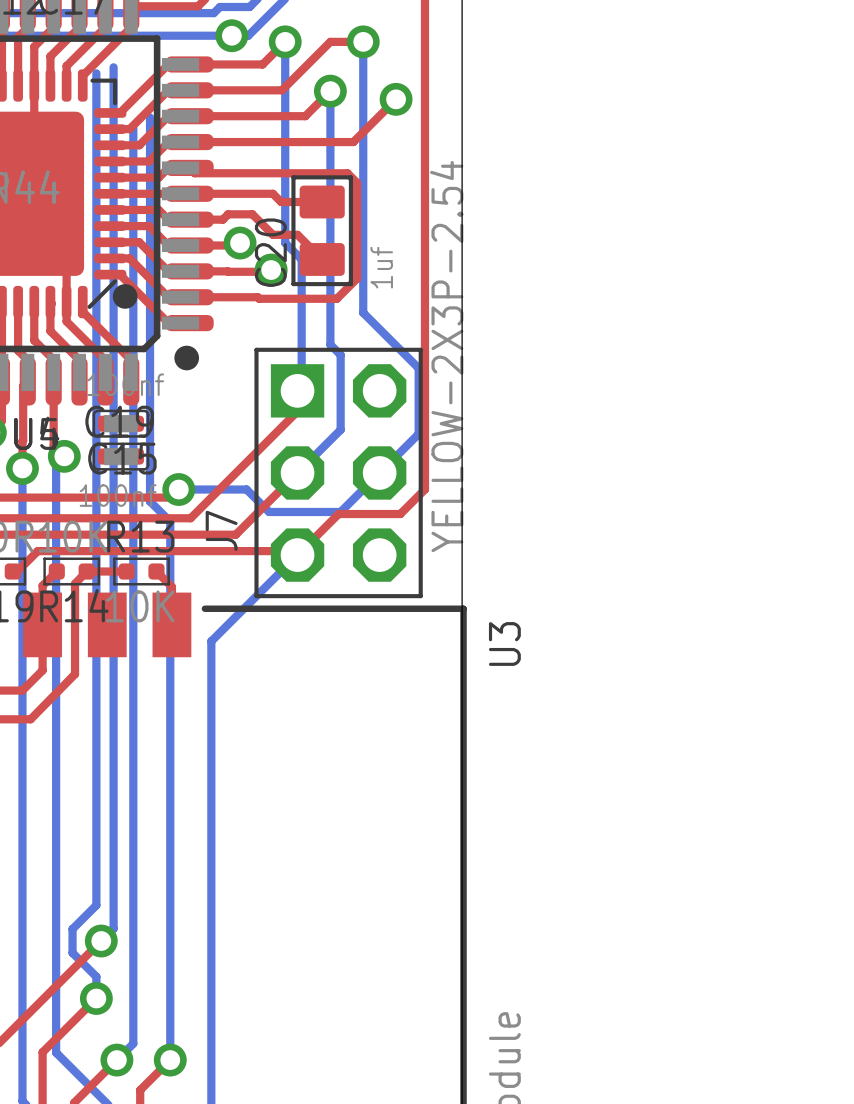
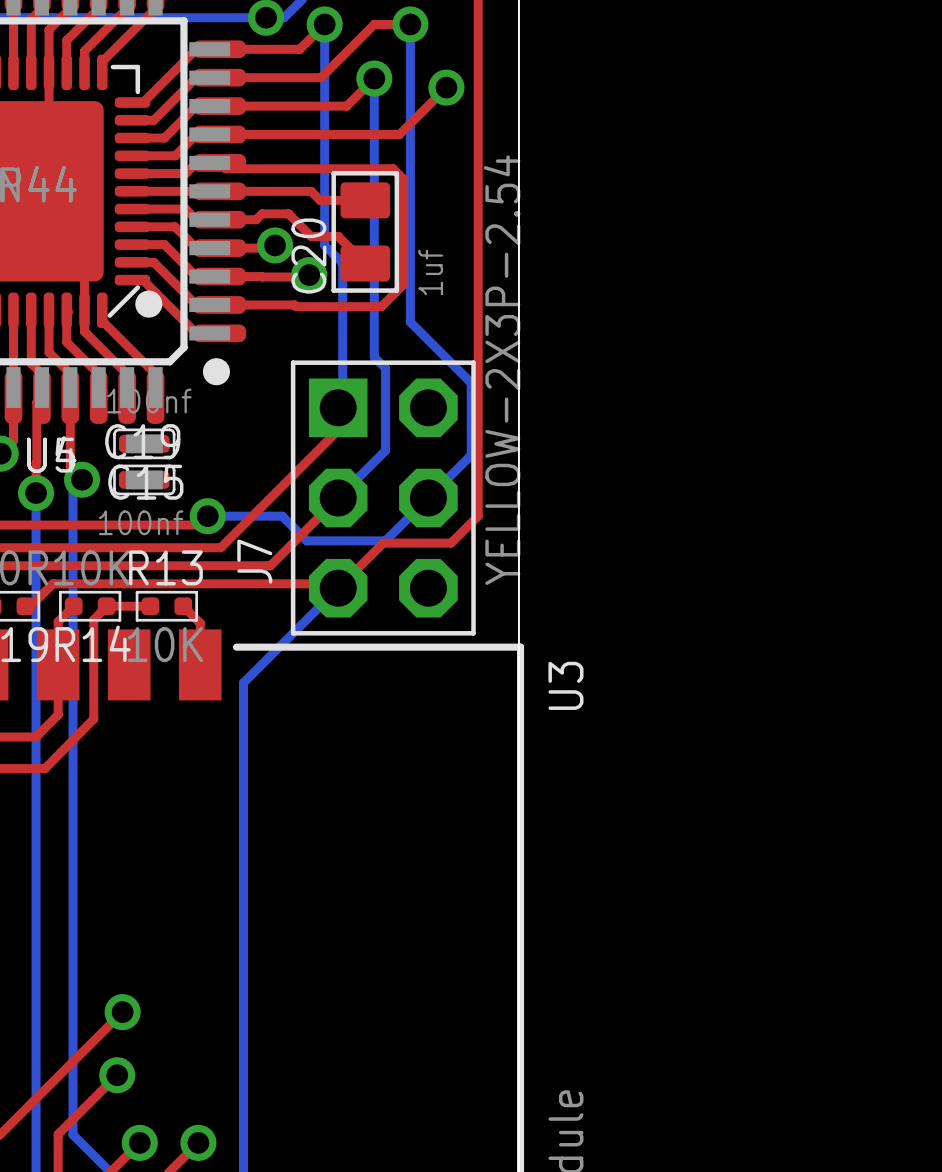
bottom track: (113, 67) (113, 928) (101, 941) -> none
bottom track: (96, 73) (96, 905) (72, 929) (72, 952) (96, 976) (96, 998) -> none
bottom track: (150, 117) (150, 501) (170, 521) (170, 1060) -> none
bottom track: (133, 128) (133, 1043) (116, 1060) -> none

